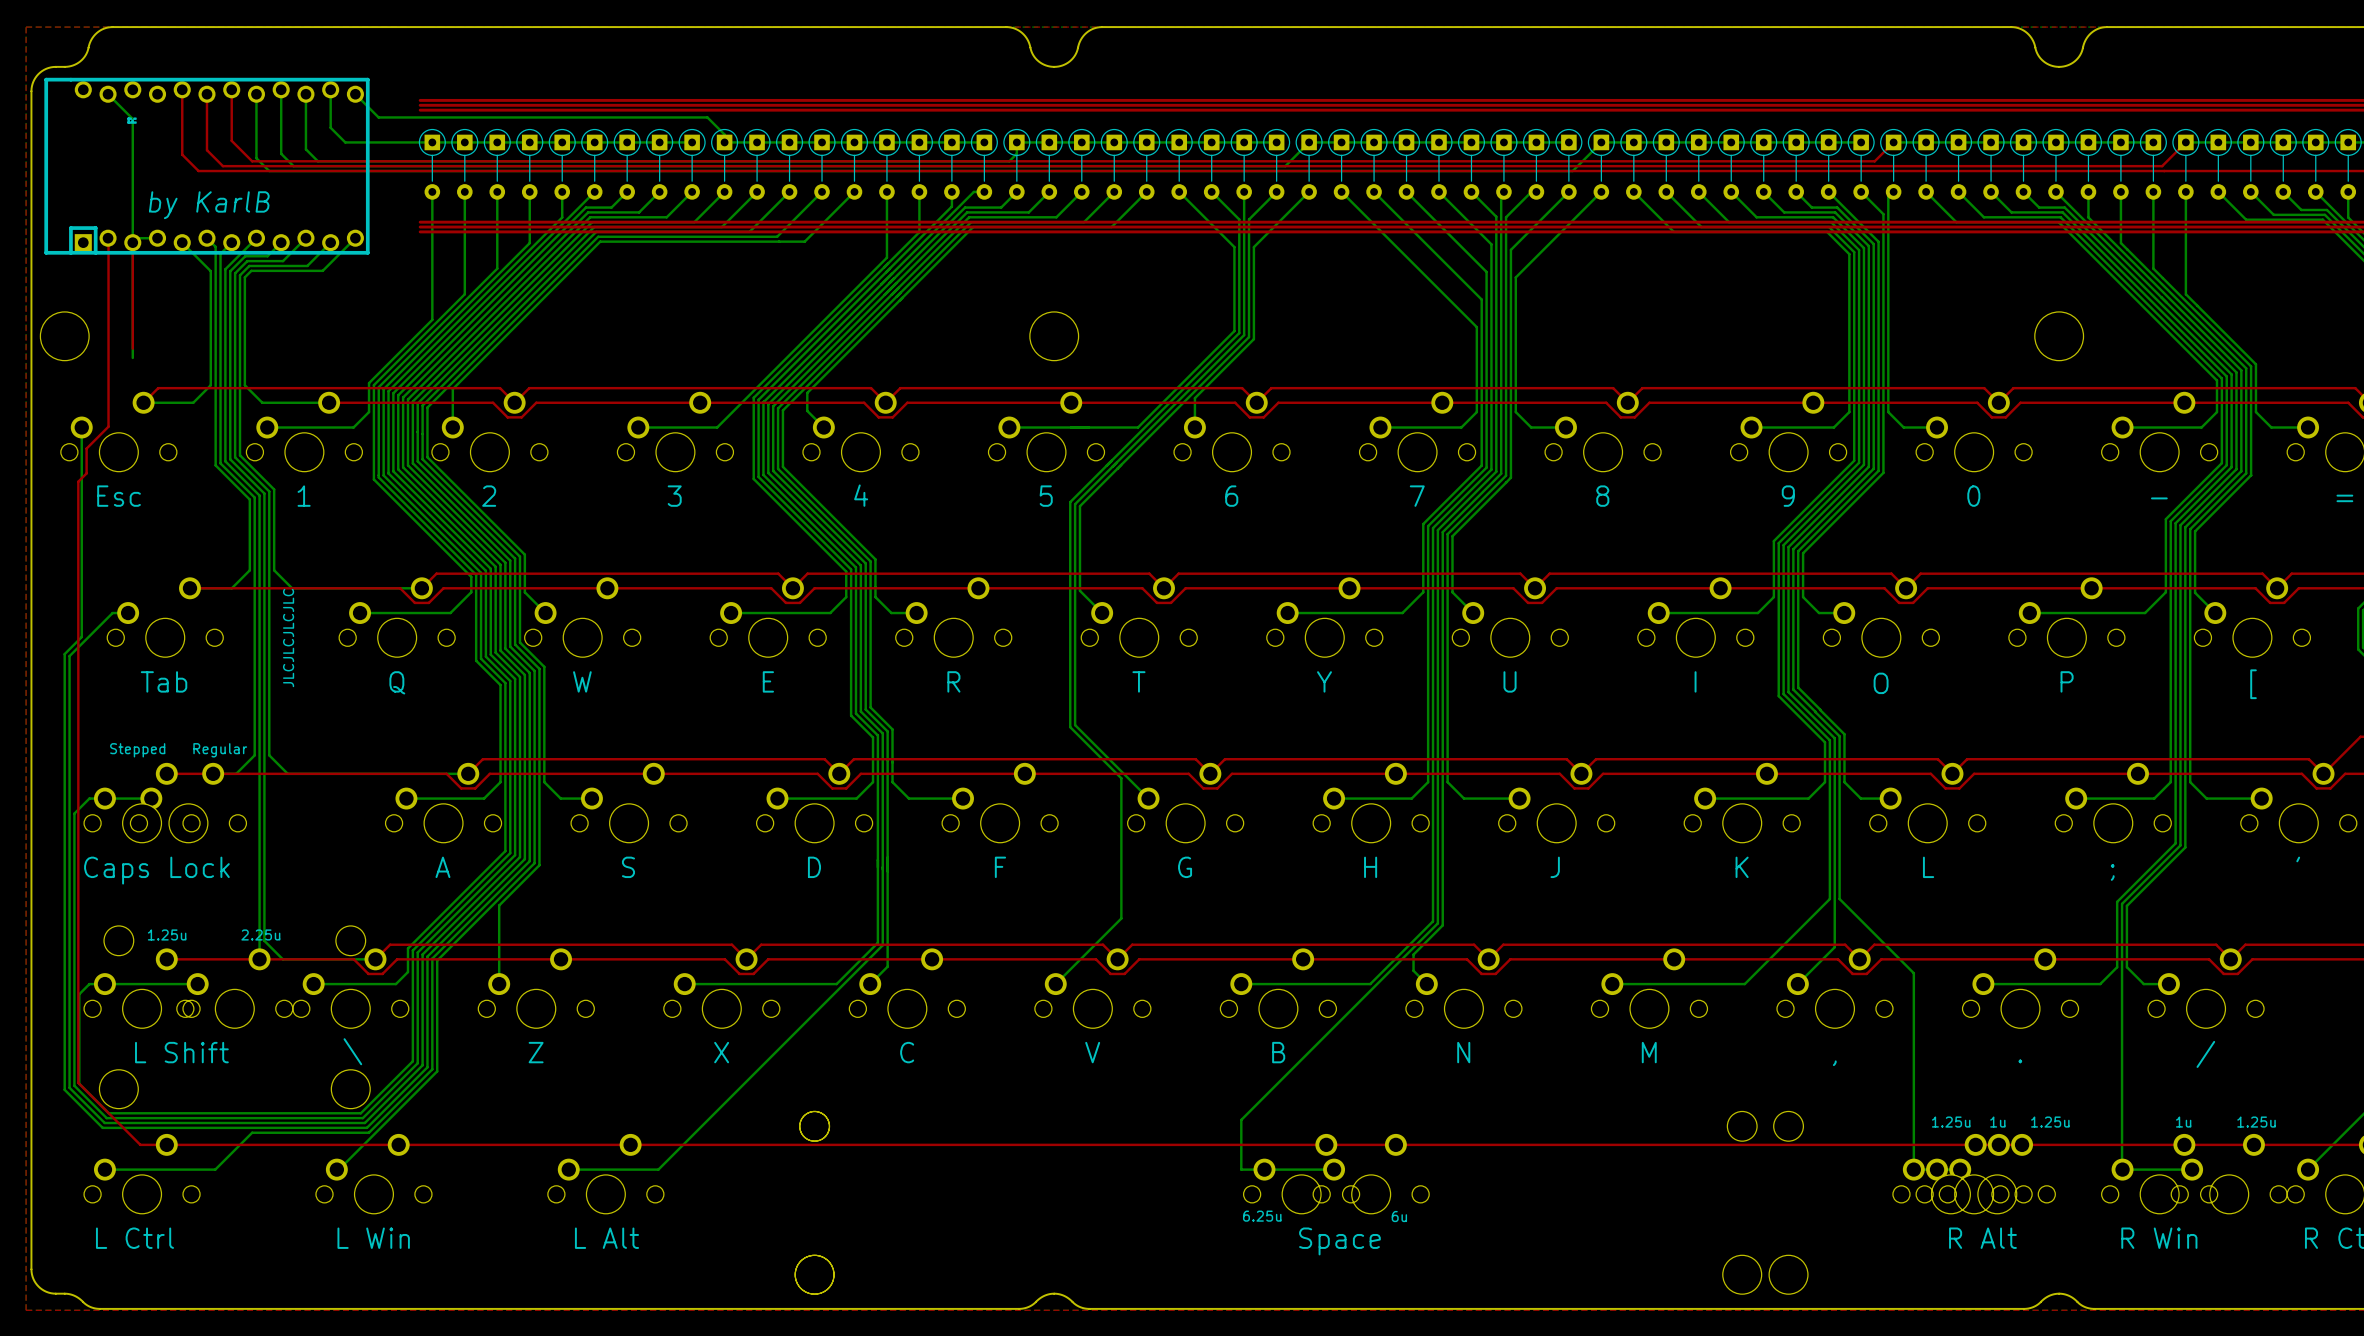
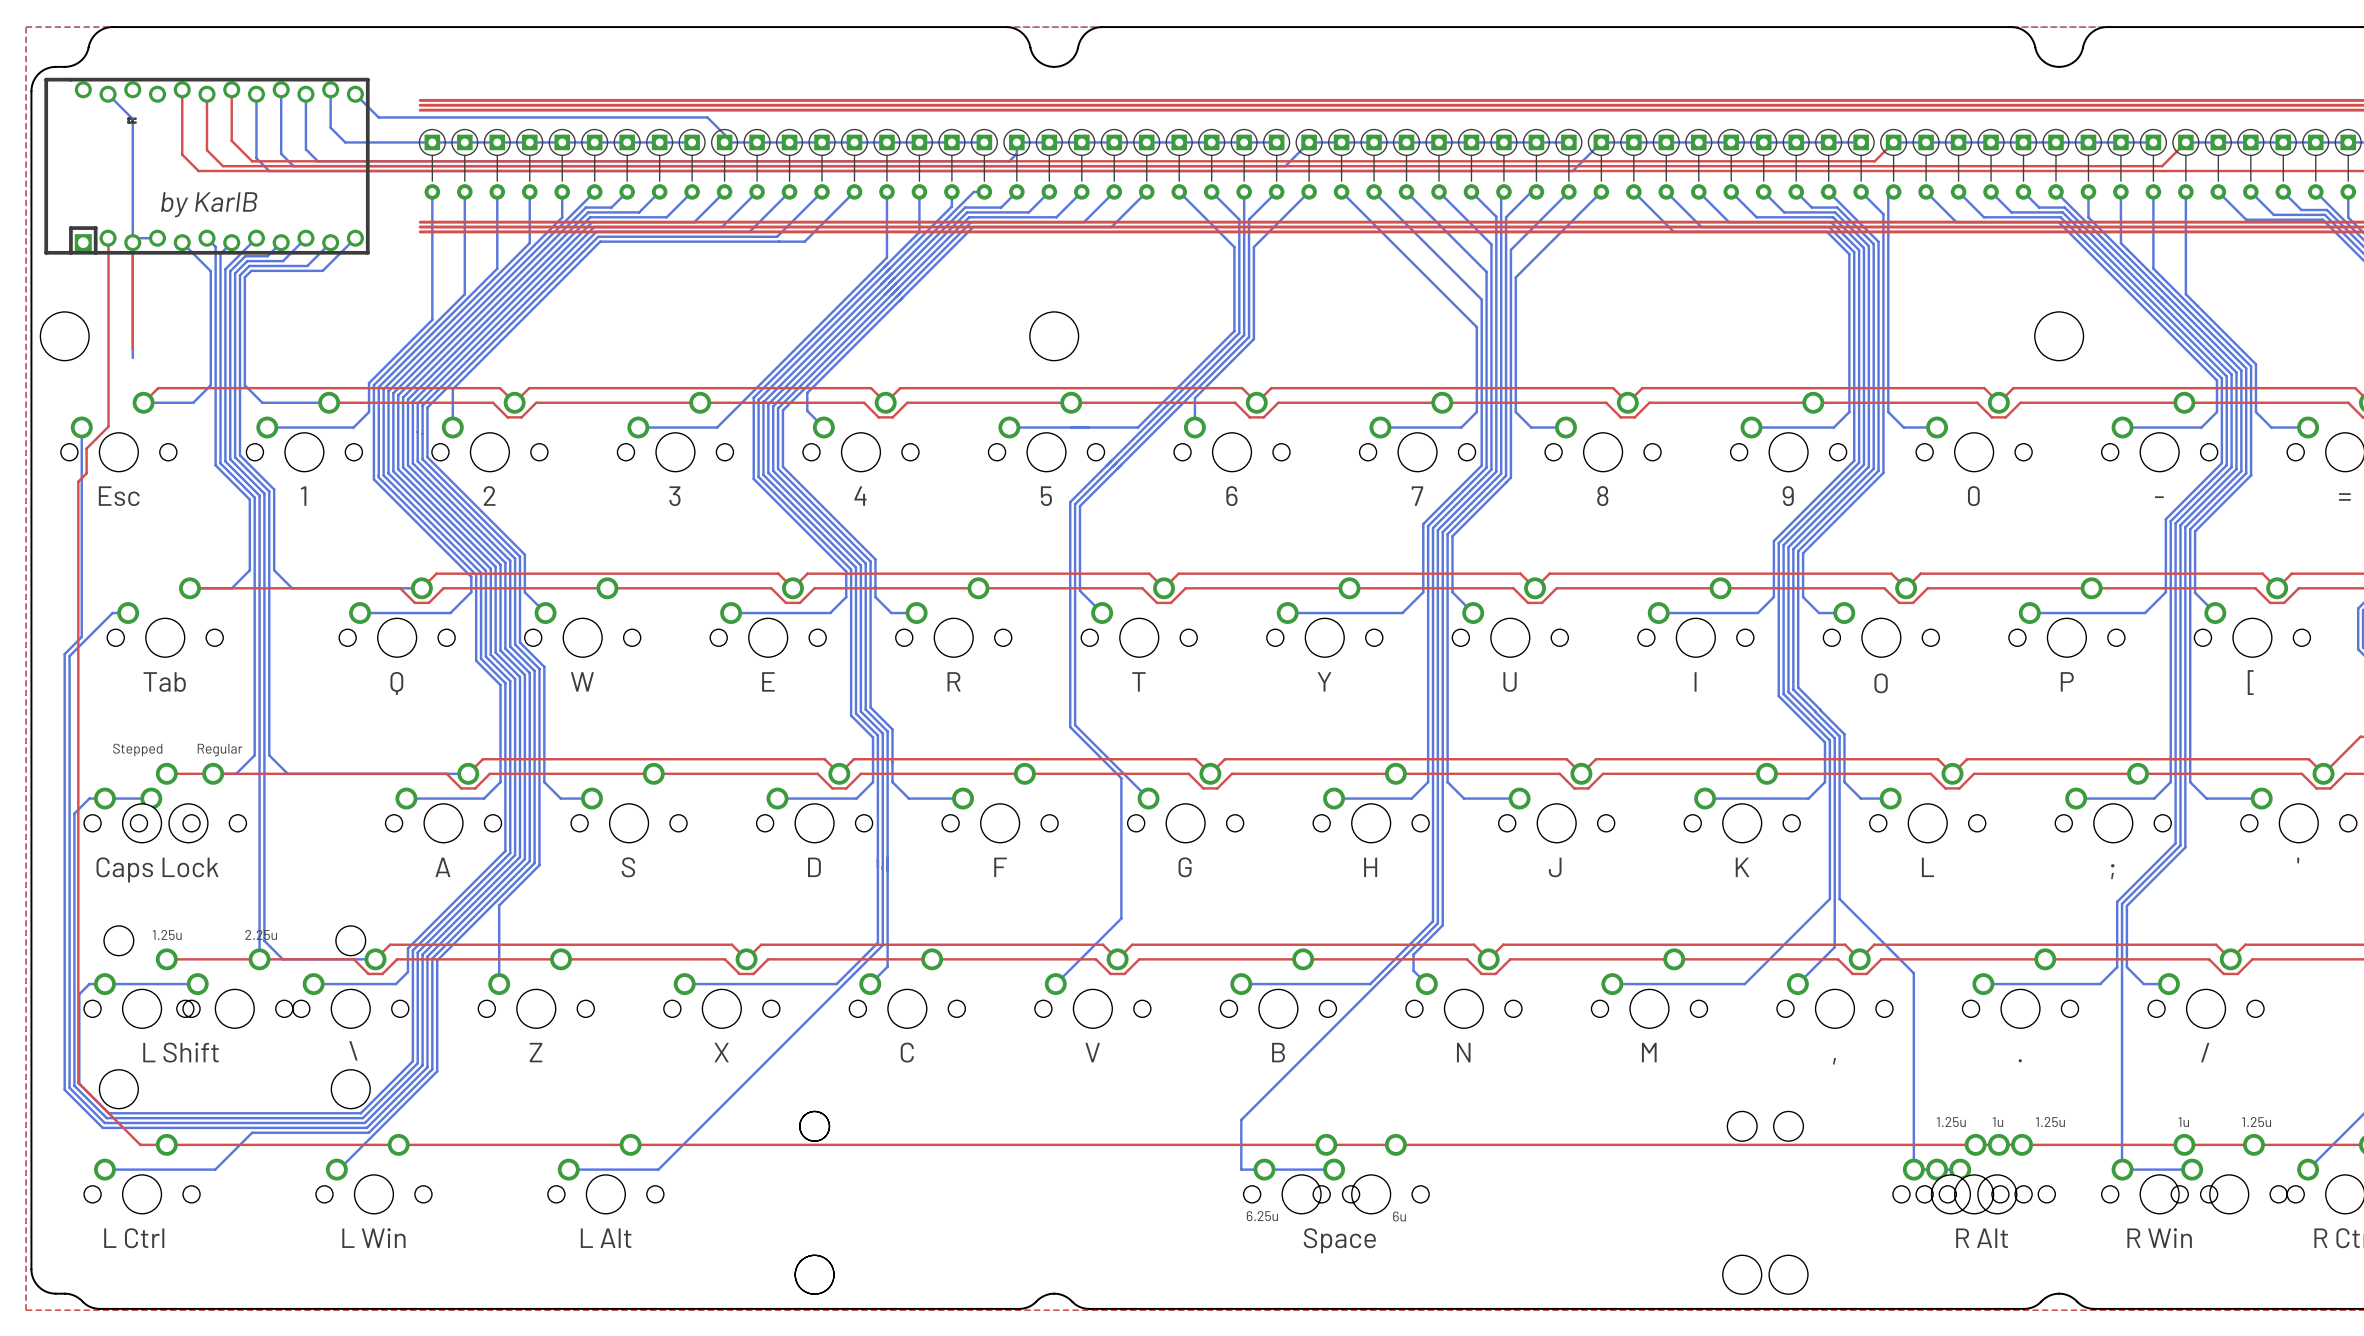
text: JLCJLCJLCJLC (288, 638) -> none

